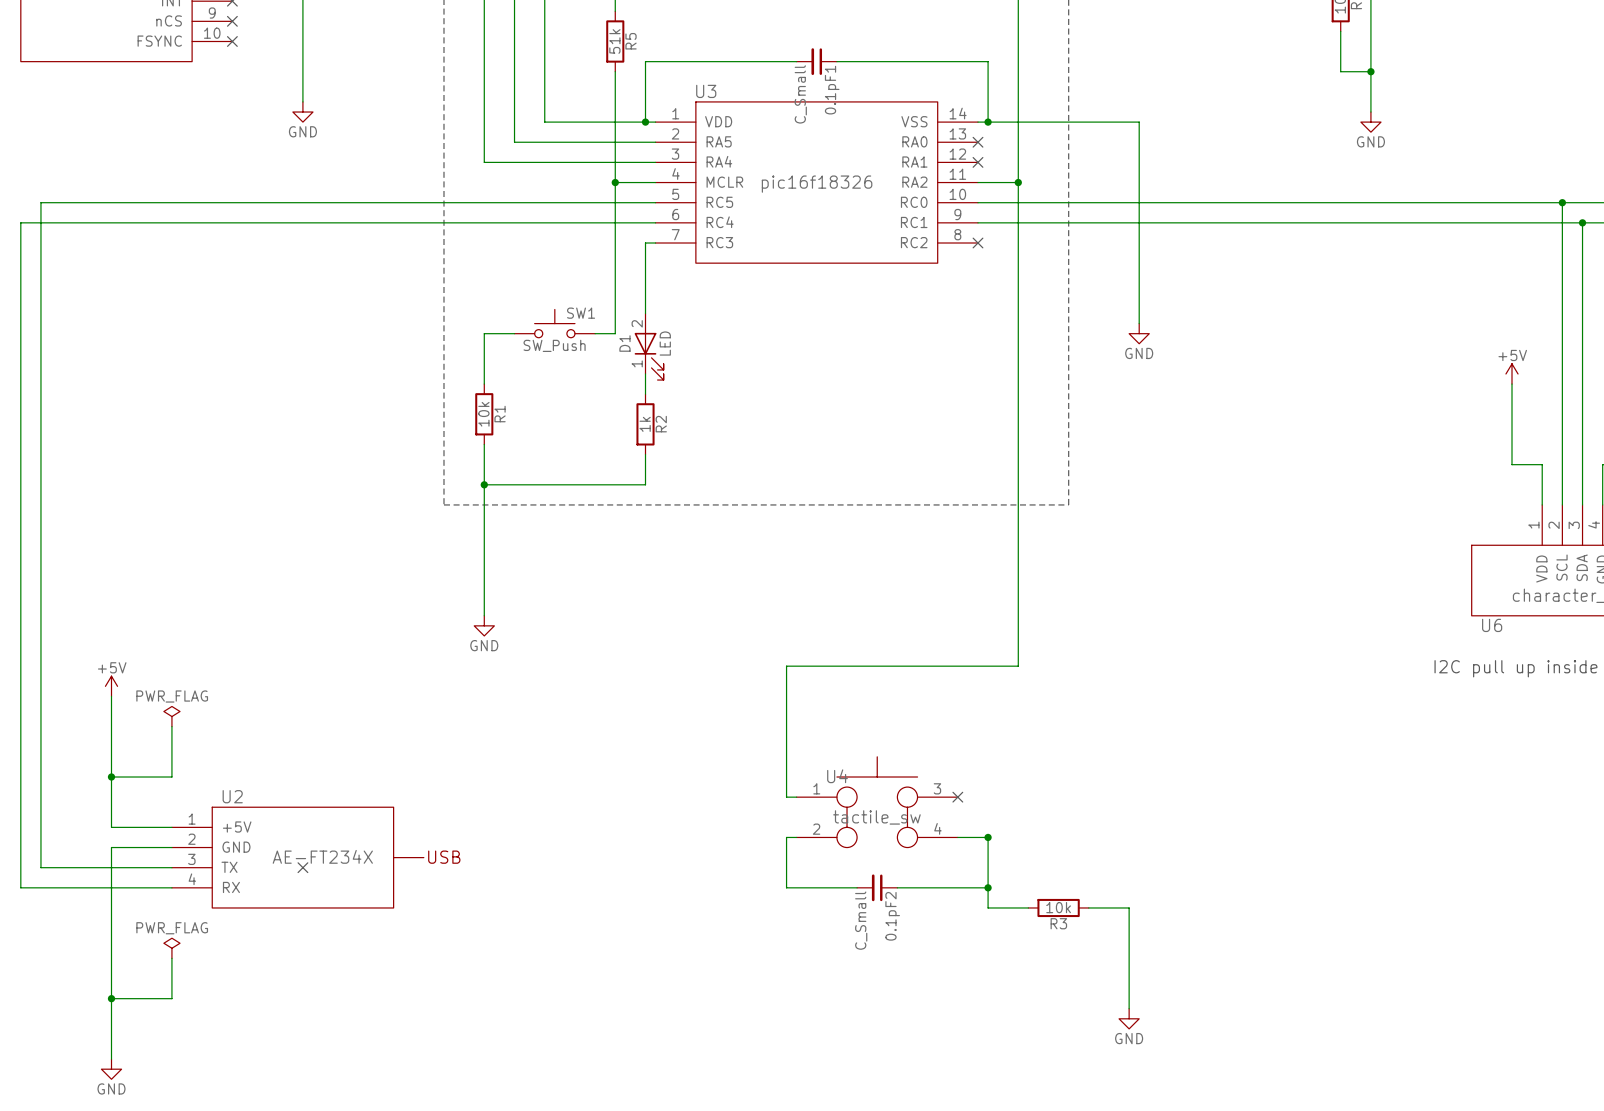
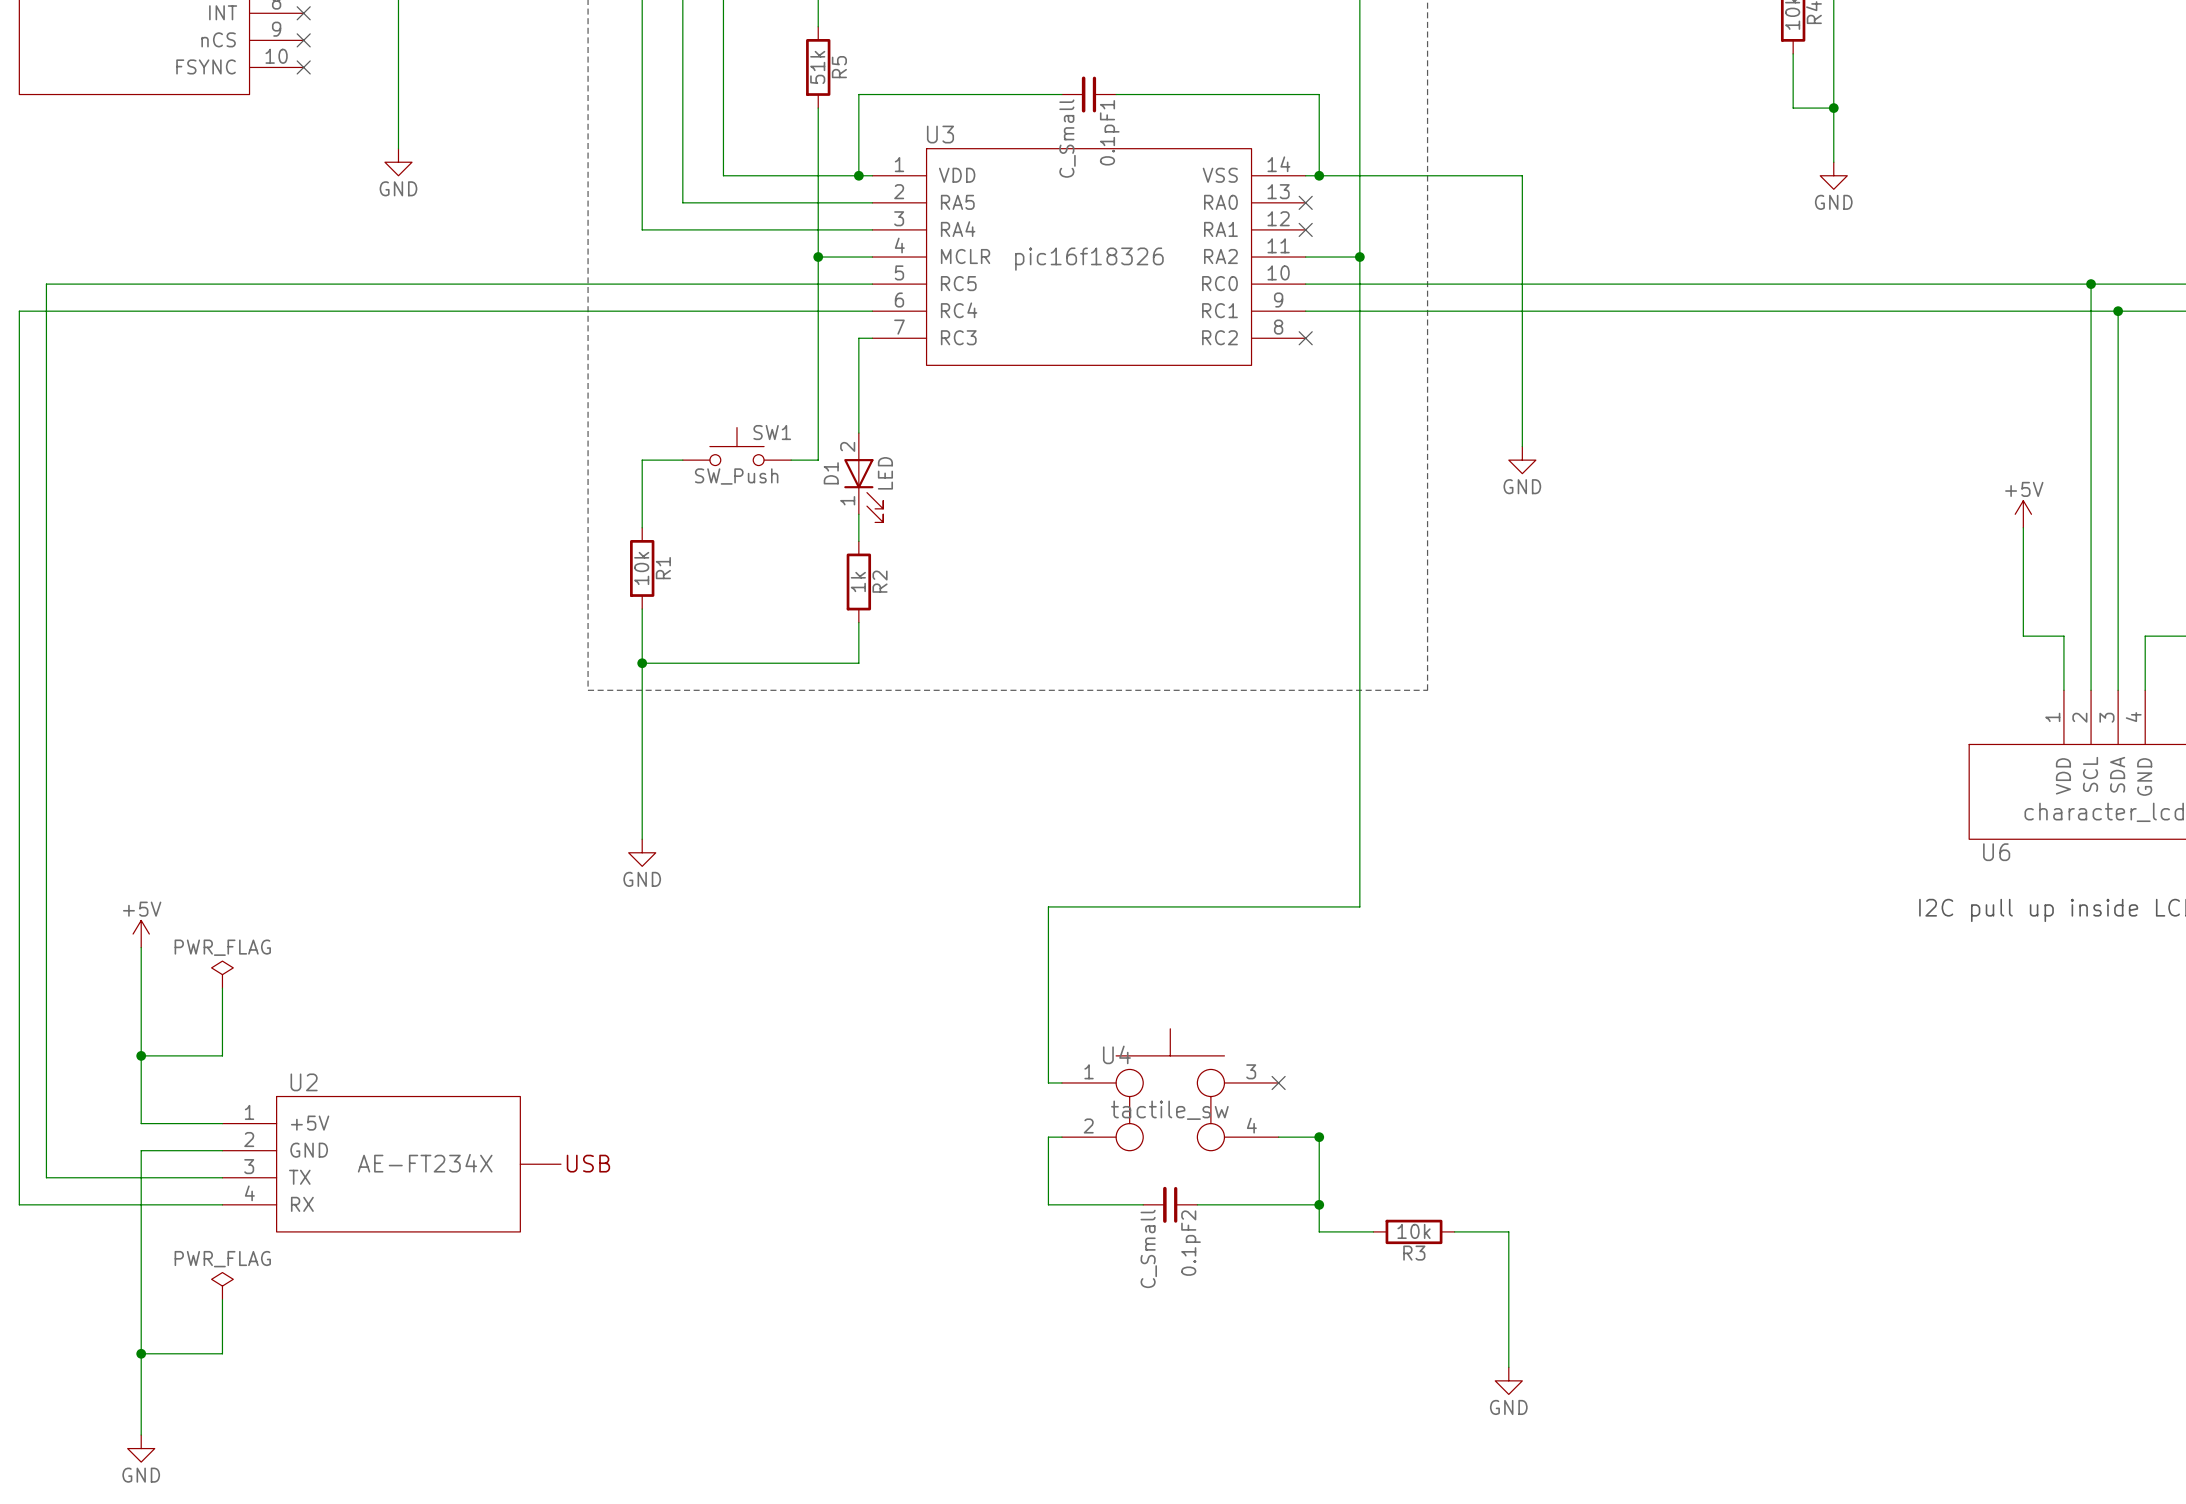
no-connect mark: (302, 867) -> none

